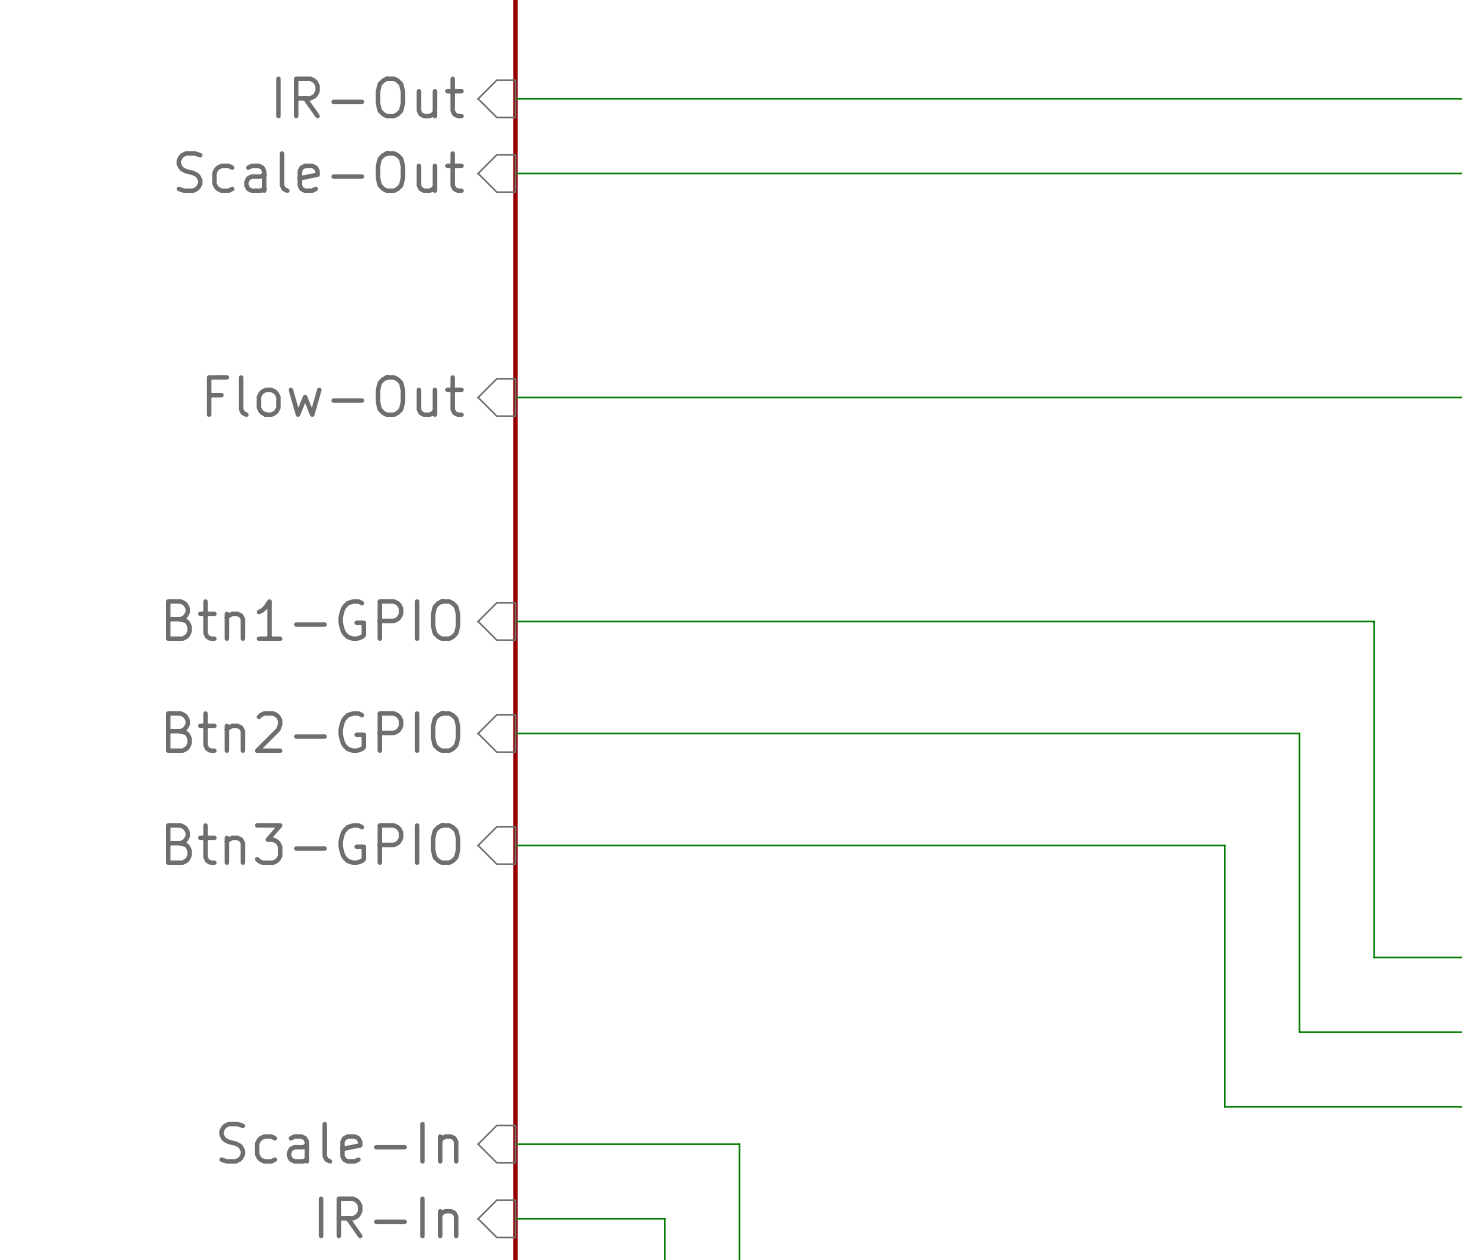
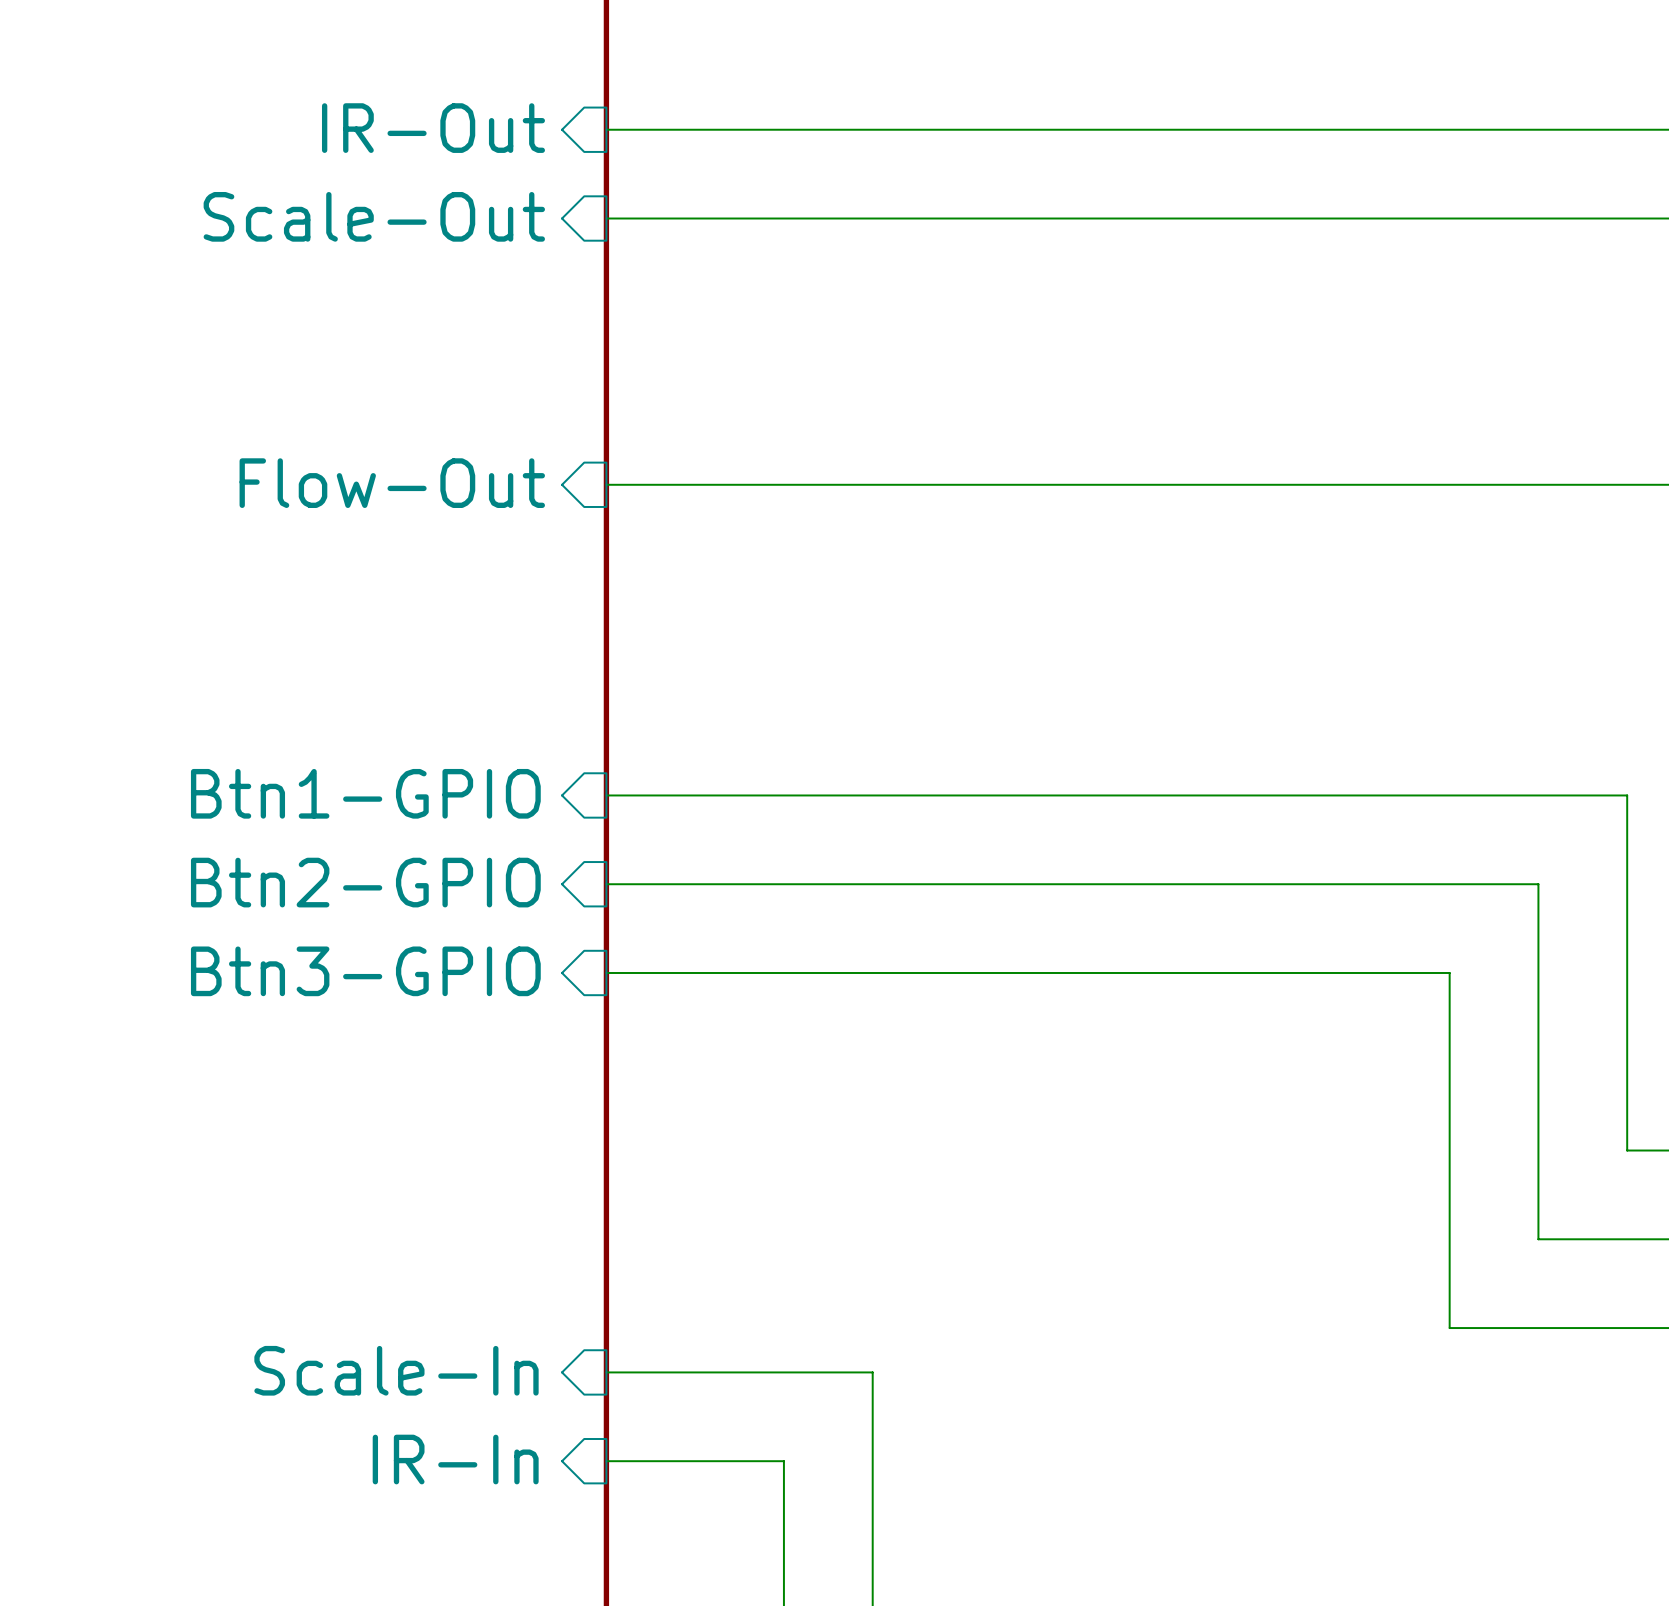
sheet pin position: Btn1-GPIO (313, 620) -> Btn1-GPIO (365, 793)
wire: (515, 621) (1374, 621) (1374, 658) -> (606, 795) (1627, 795)
sheet pin position: Btn3-GPIO (313, 844) -> Btn3-GPIO (365, 971)
wire: (515, 845) (1224, 845) -> (606, 972) (1449, 972) (1449, 1017)

